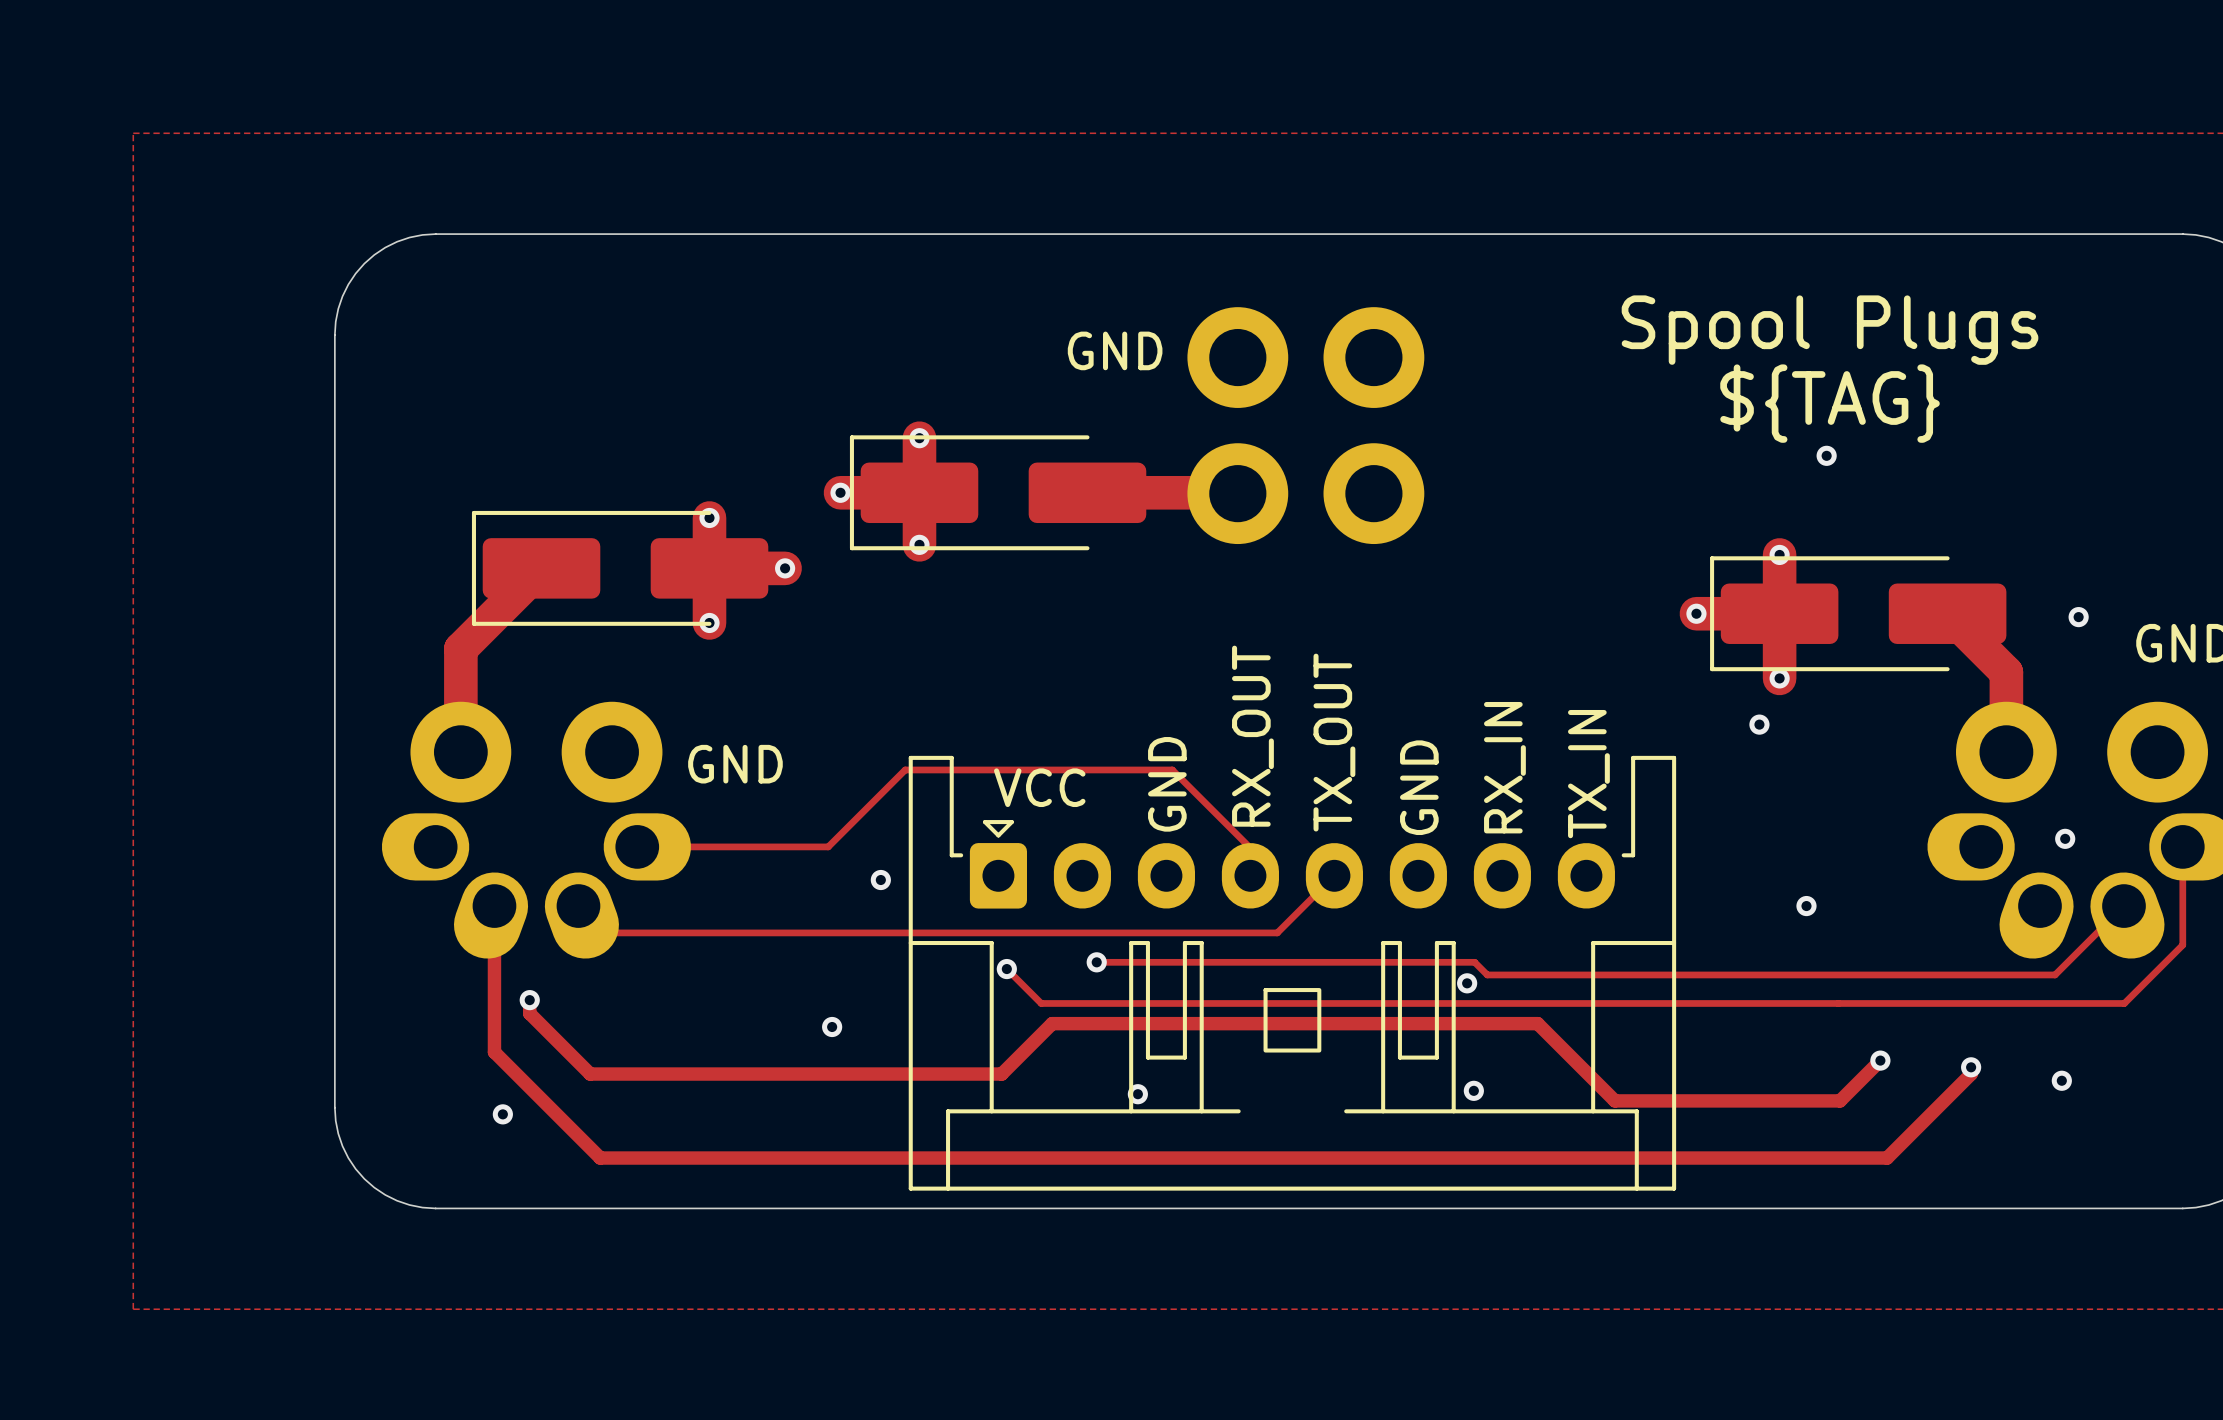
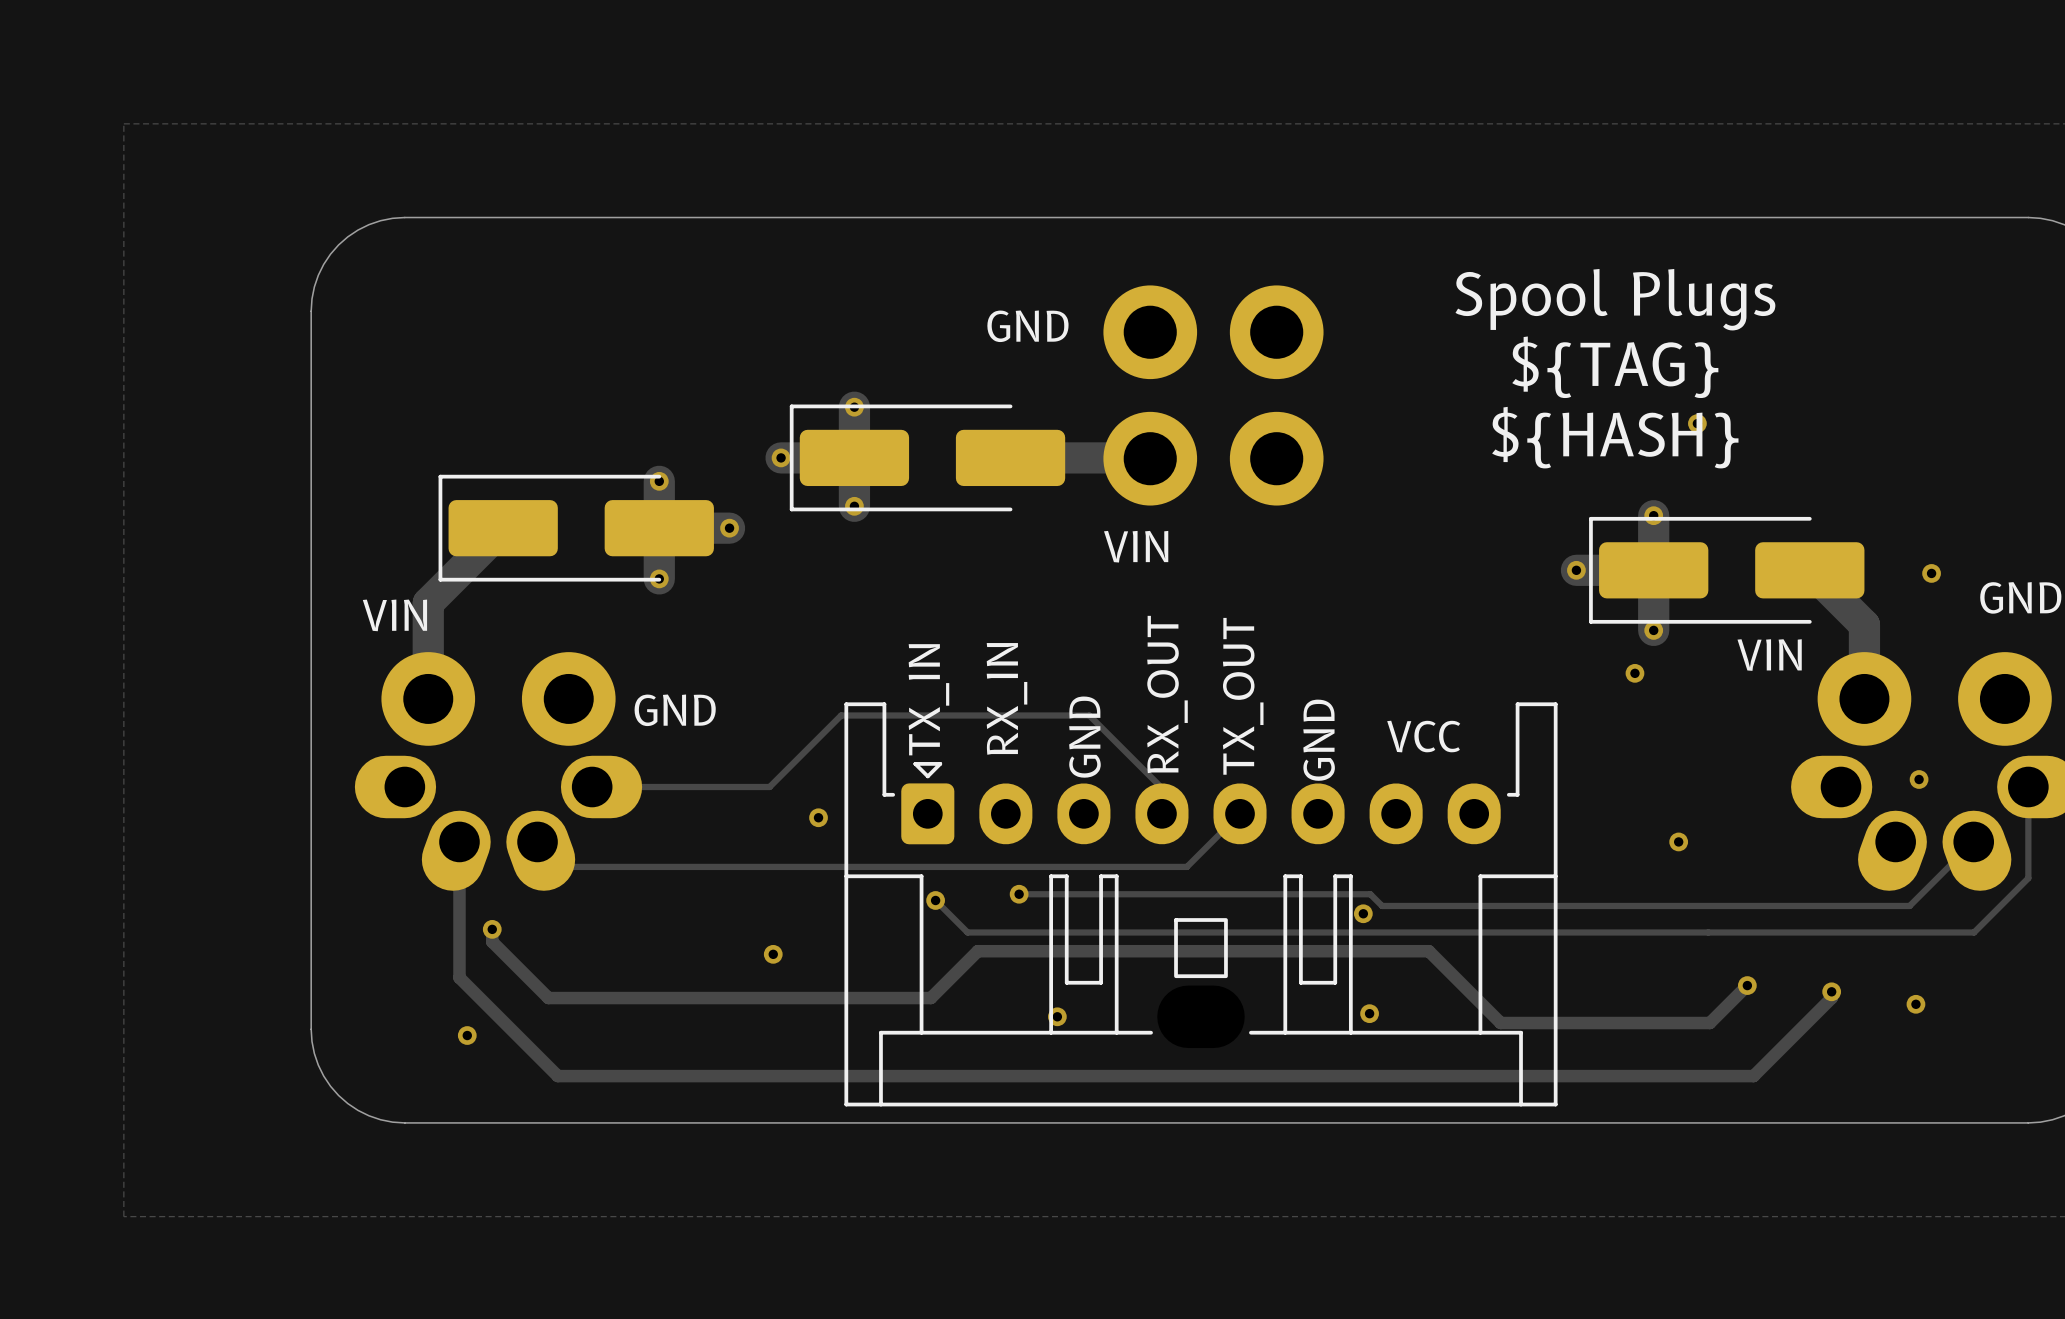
text position: Spool Plugs (1830, 330) -> Spool Plugs (1615, 299)
text position: ${TAG} (1830, 403) -> ${TAG} (1615, 367)
text: none -> ${HASH} (1615, 437)
text: none -> VIN (1136, 546)
text: none -> VIN (394, 615)
text: none -> VIN (1769, 655)
text position: RX_IN (1504, 767) -> RX_IN (1007, 698)
text: TX_IN (1588, 774) -> none
text: VCC (1039, 787) -> TX_IN (928, 699)
text: none -> VCC (1423, 736)

